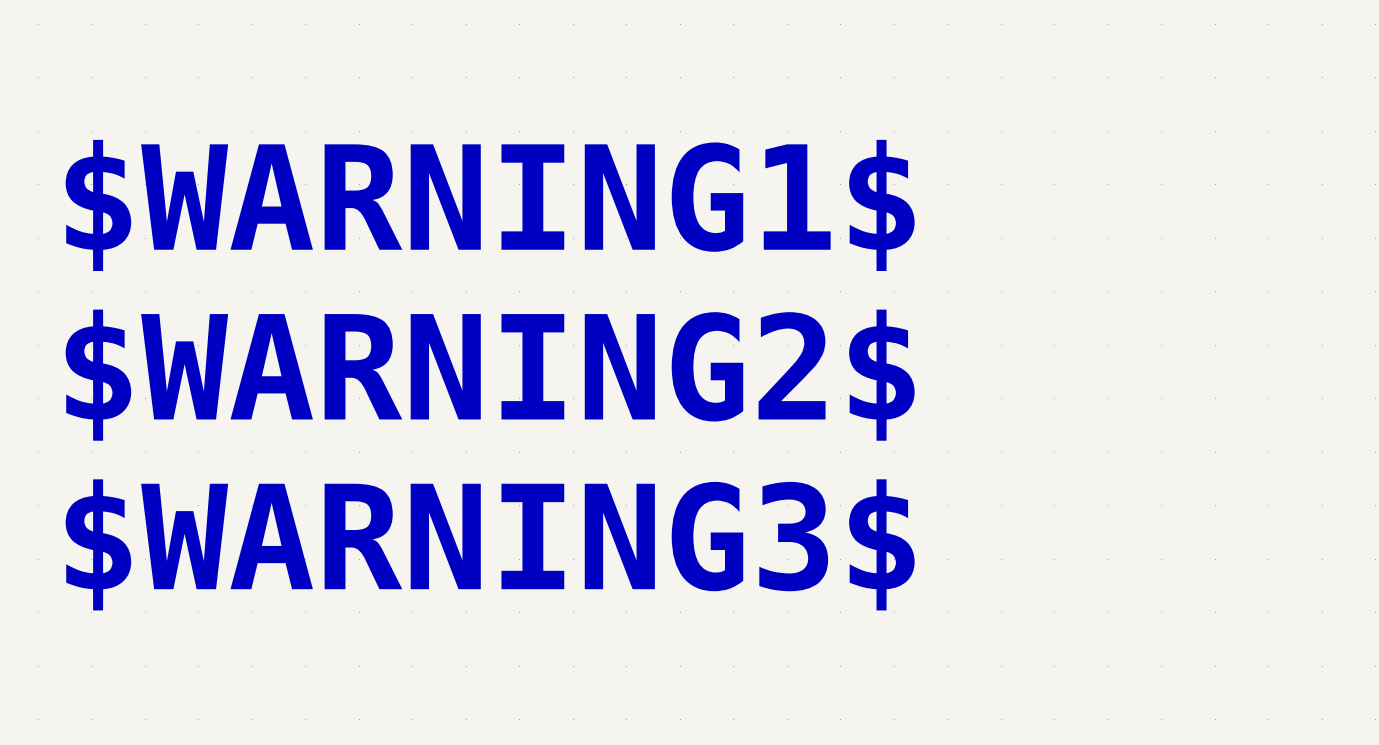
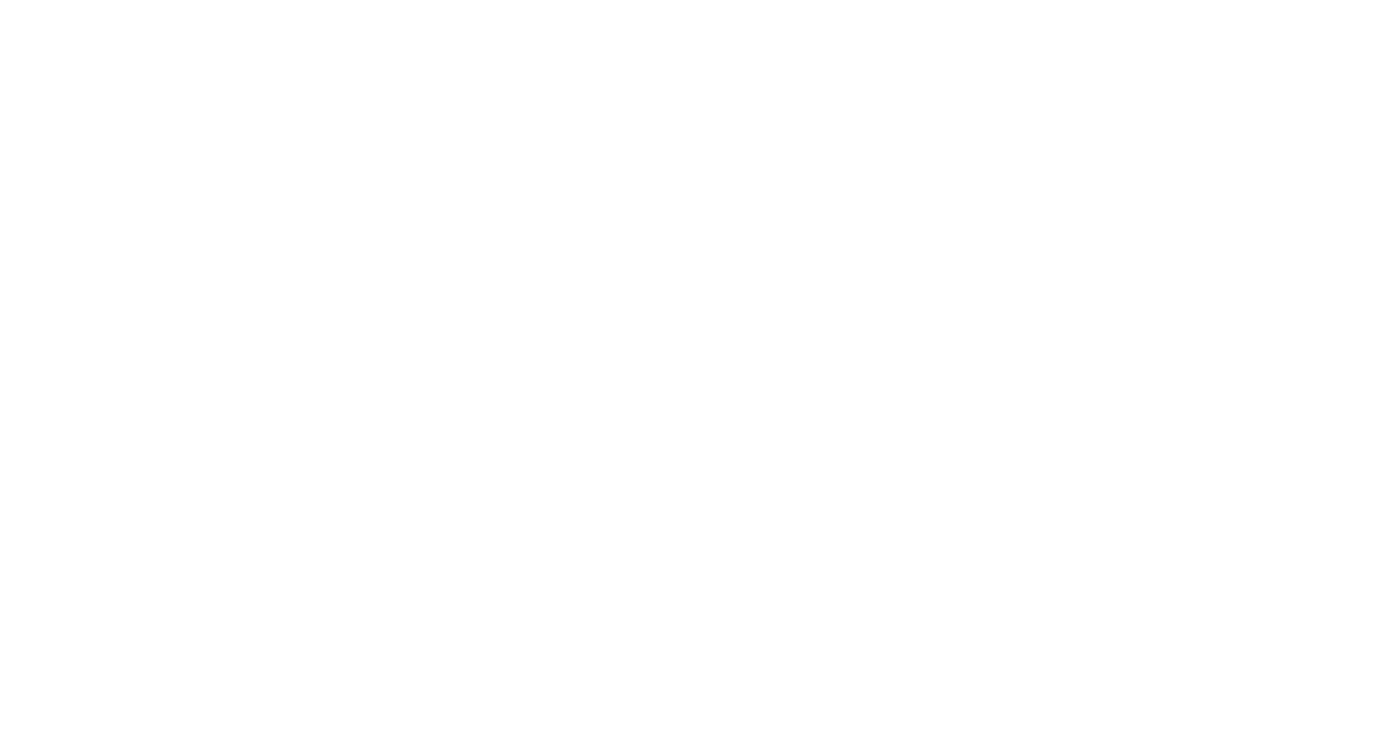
text: $WARNING1$ (490, 205) -> none
text: $WARNING2$ (490, 375) -> none
text: $WARNING3$ (490, 544) -> none

